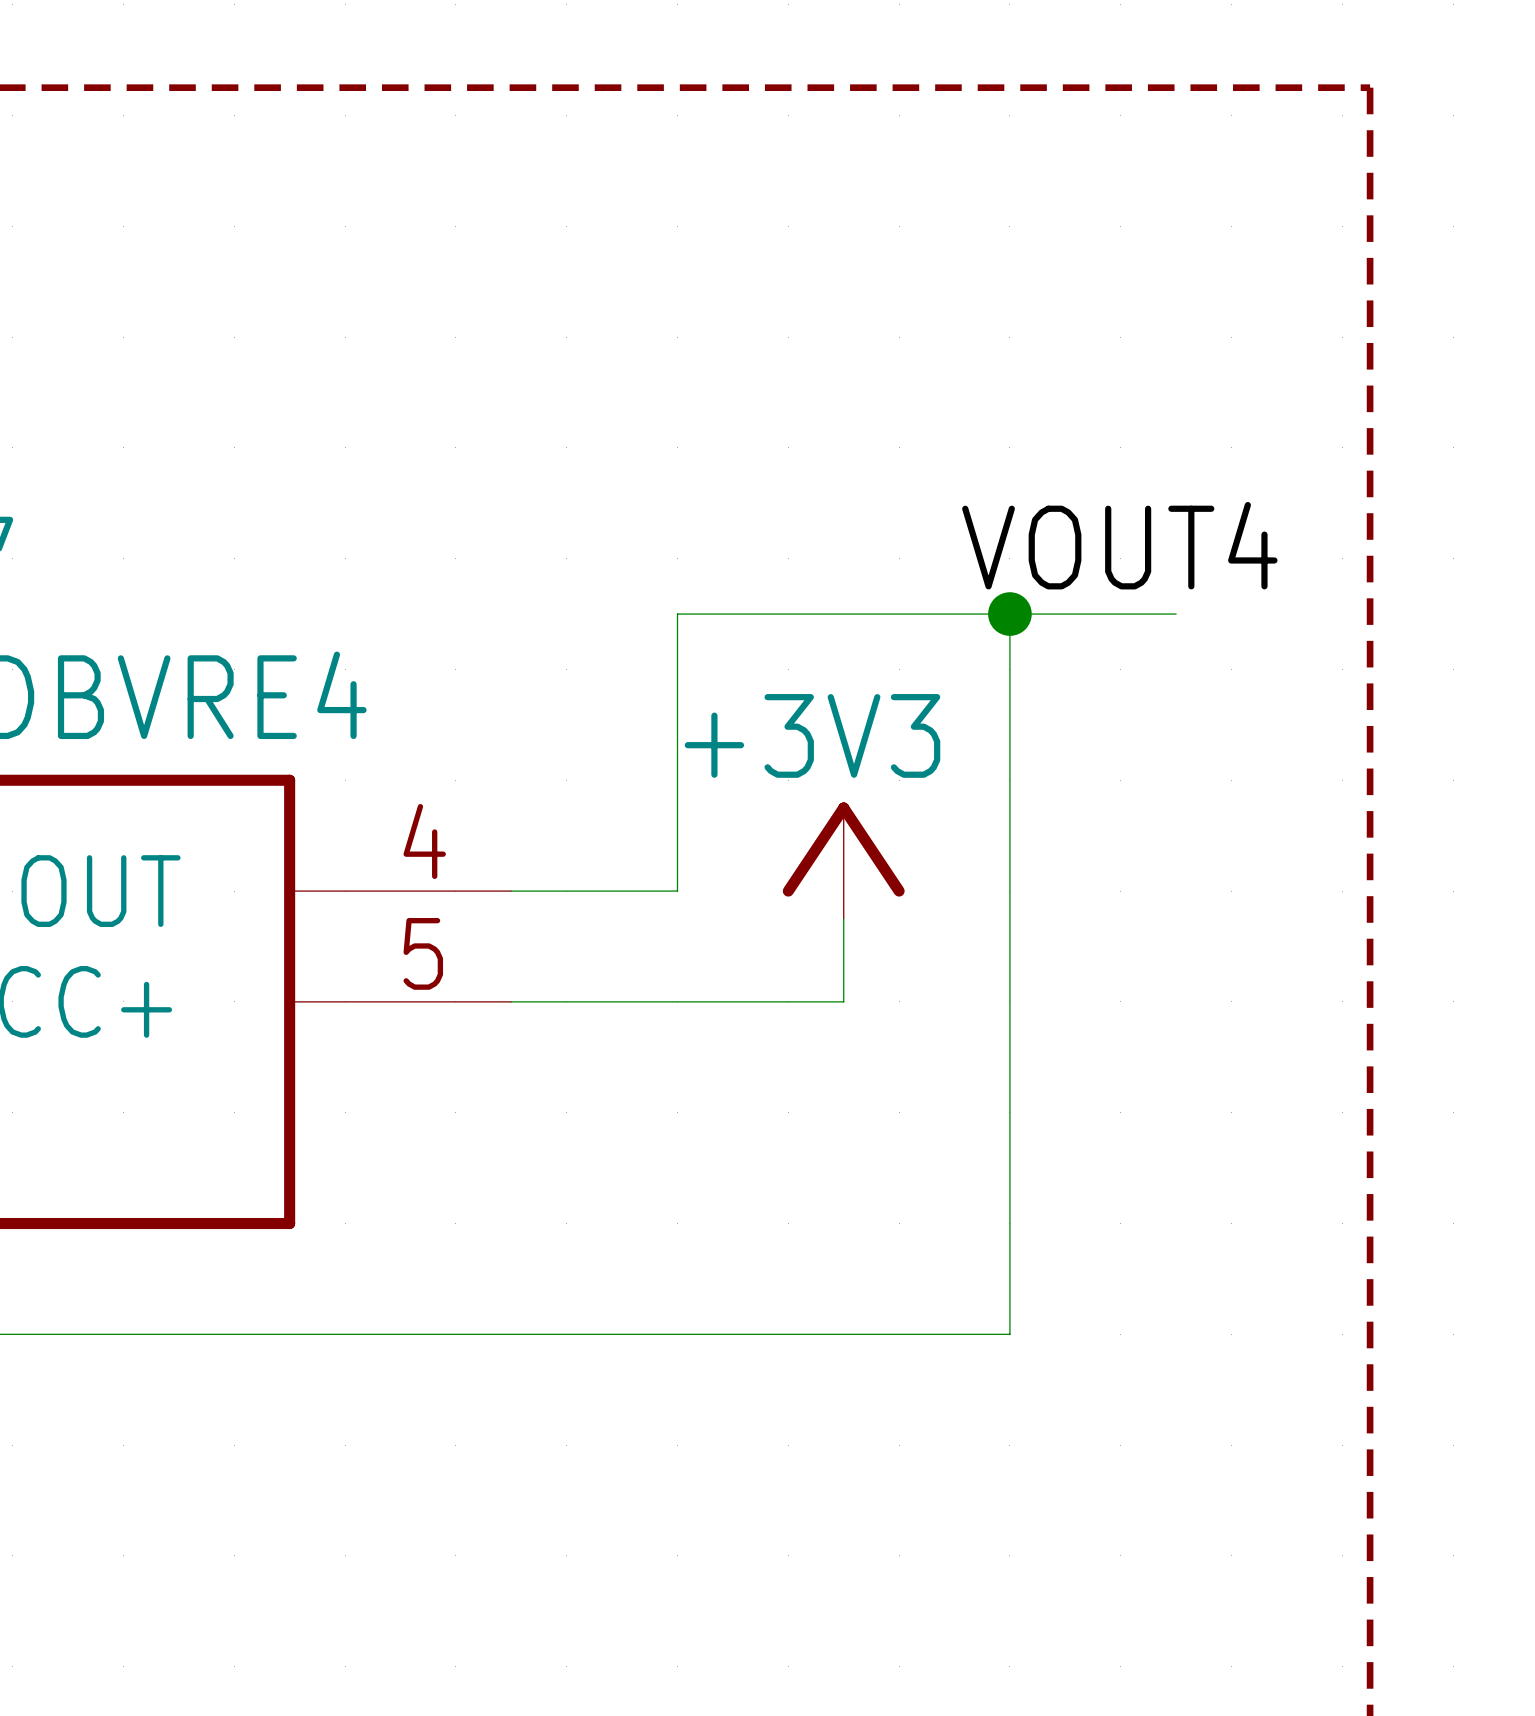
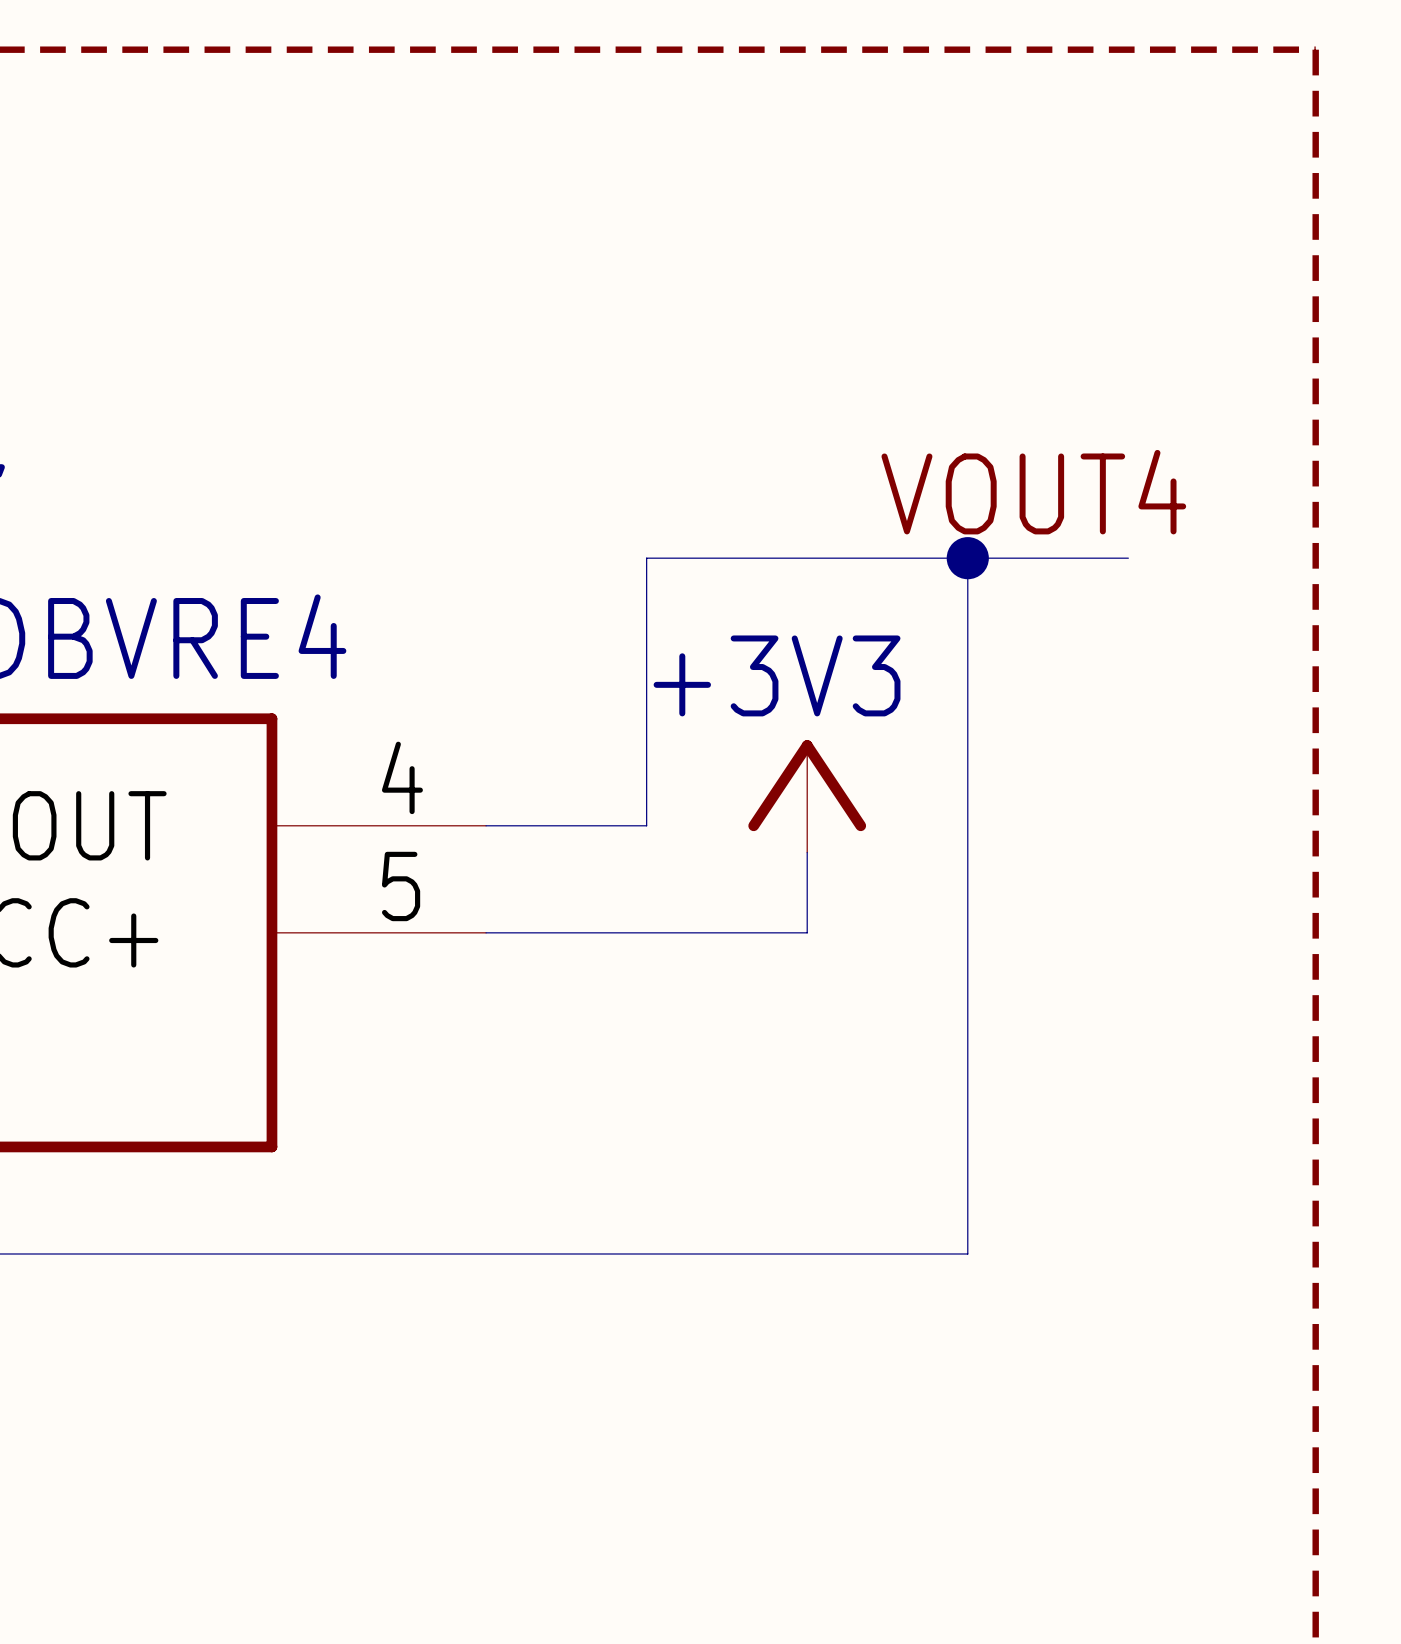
label position: VOUT4 (1119, 545) -> VOUT4 (1033, 492)

